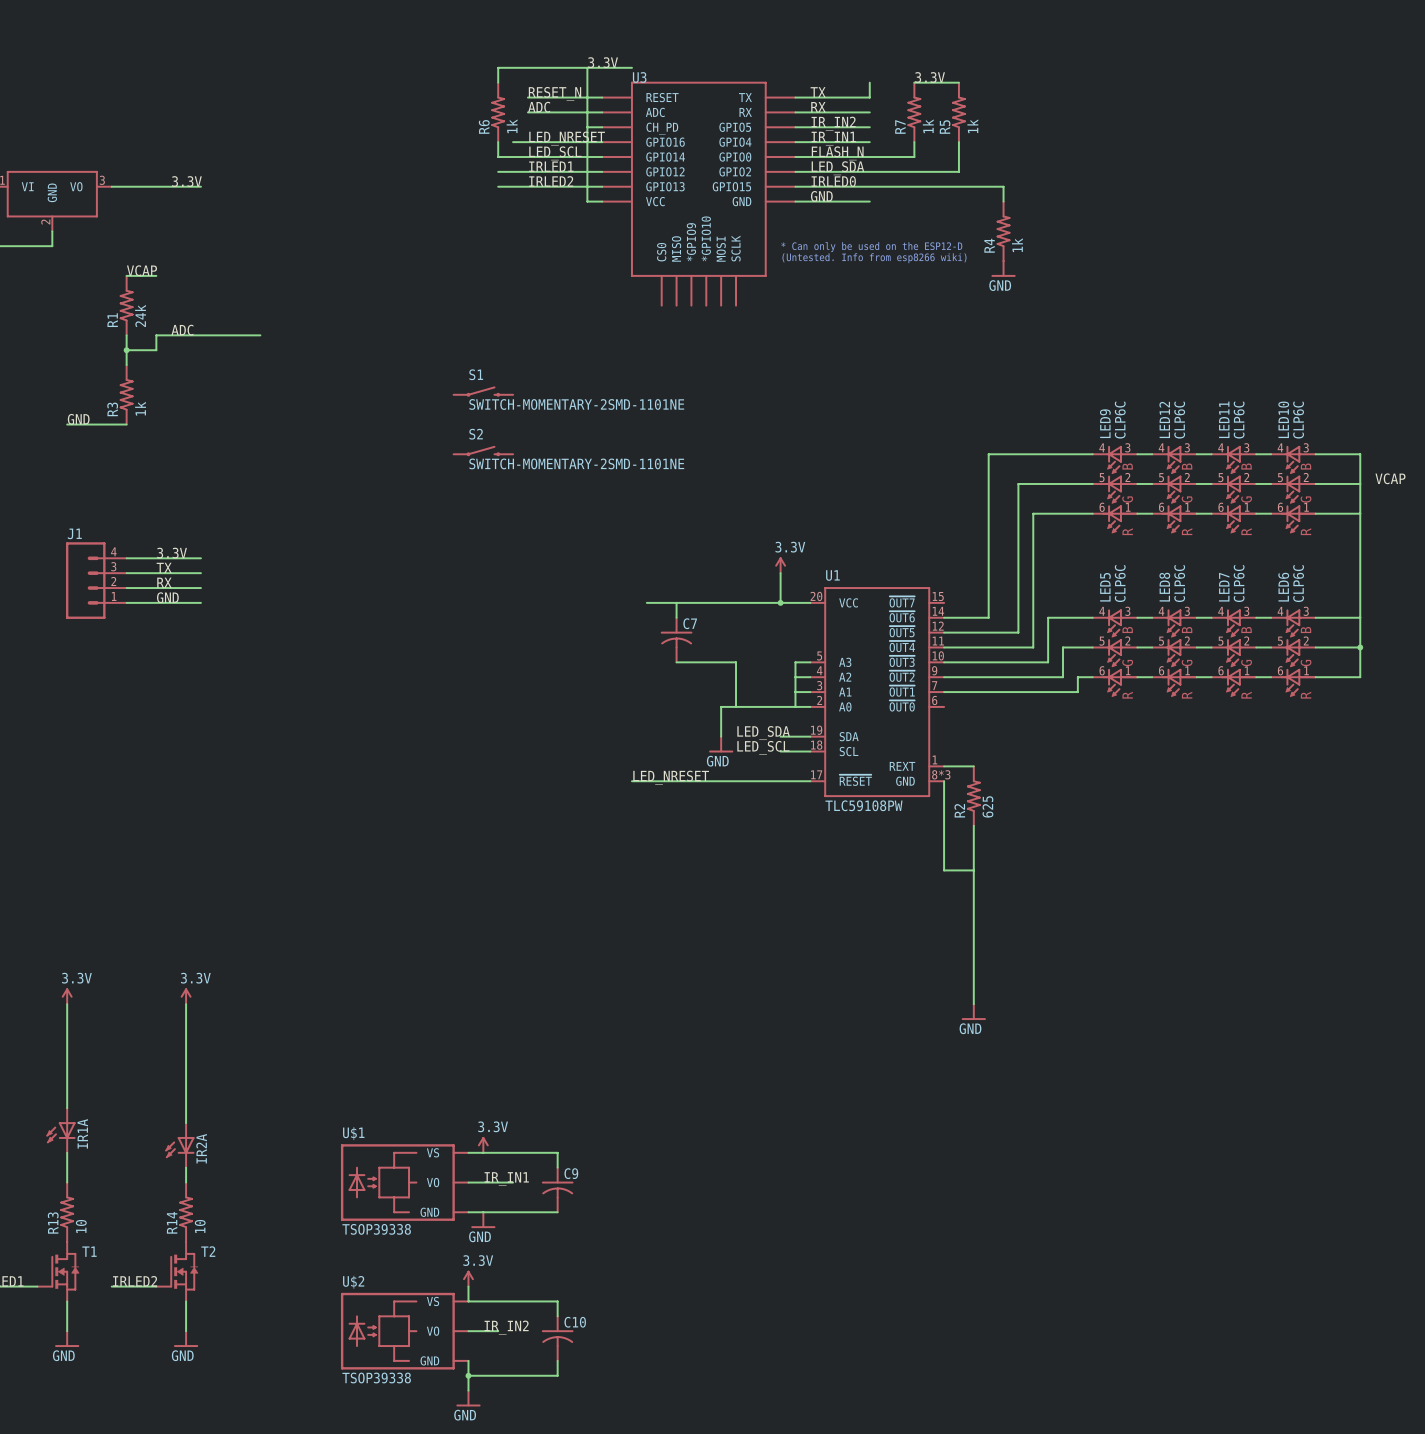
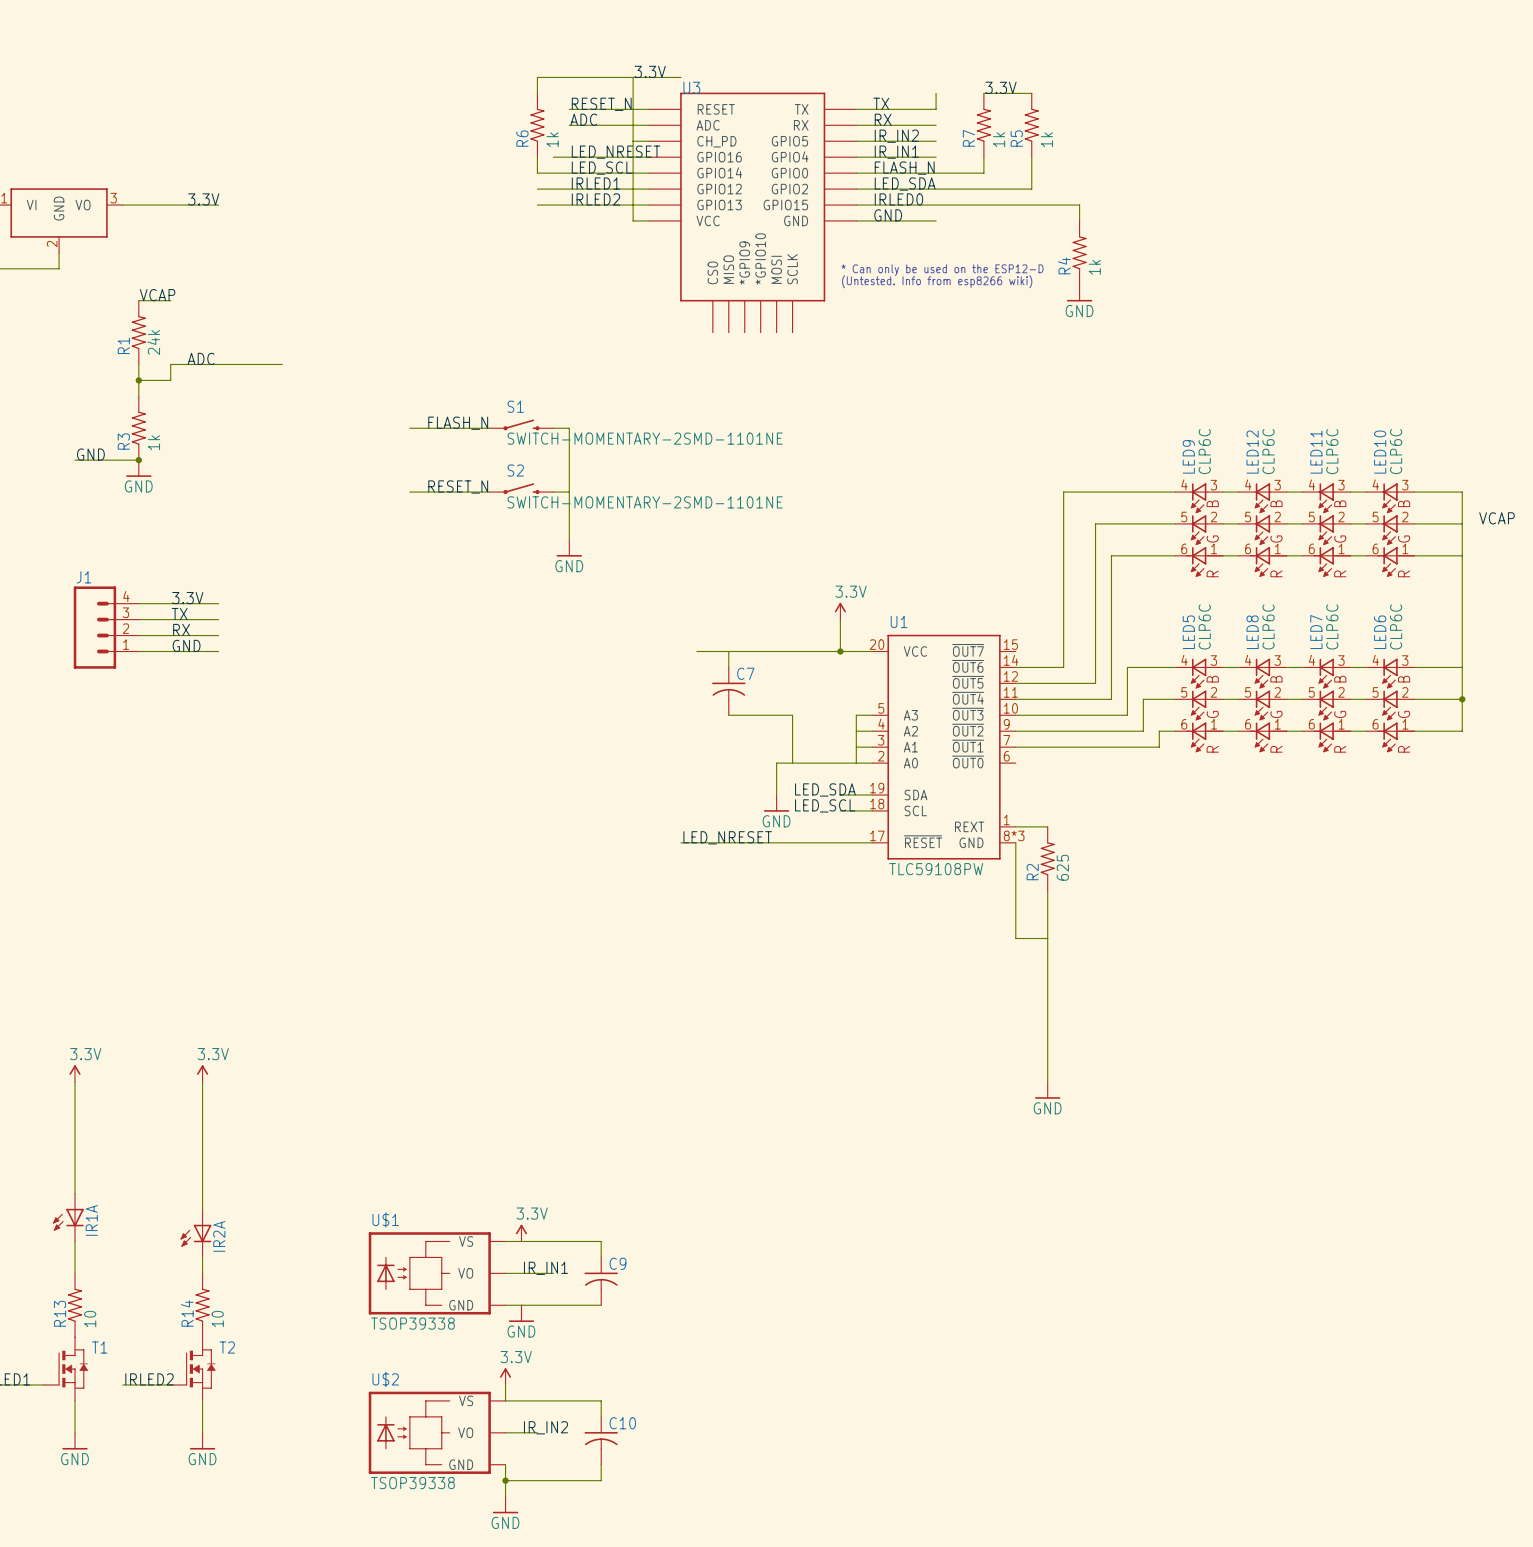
label: none -> FLASH_N (458, 423)
wire: none -> (409, 428) (489, 428)
wire: none -> (553, 428) (569, 428) (569, 539)
junction: none -> (138, 460)
power symbol: none -> GND (138, 468)
label: none -> RESET_N (458, 486)
wire: none -> (409, 492) (489, 492)
wire: none -> (553, 492) (569, 492)
power symbol: none -> GND (569, 548)

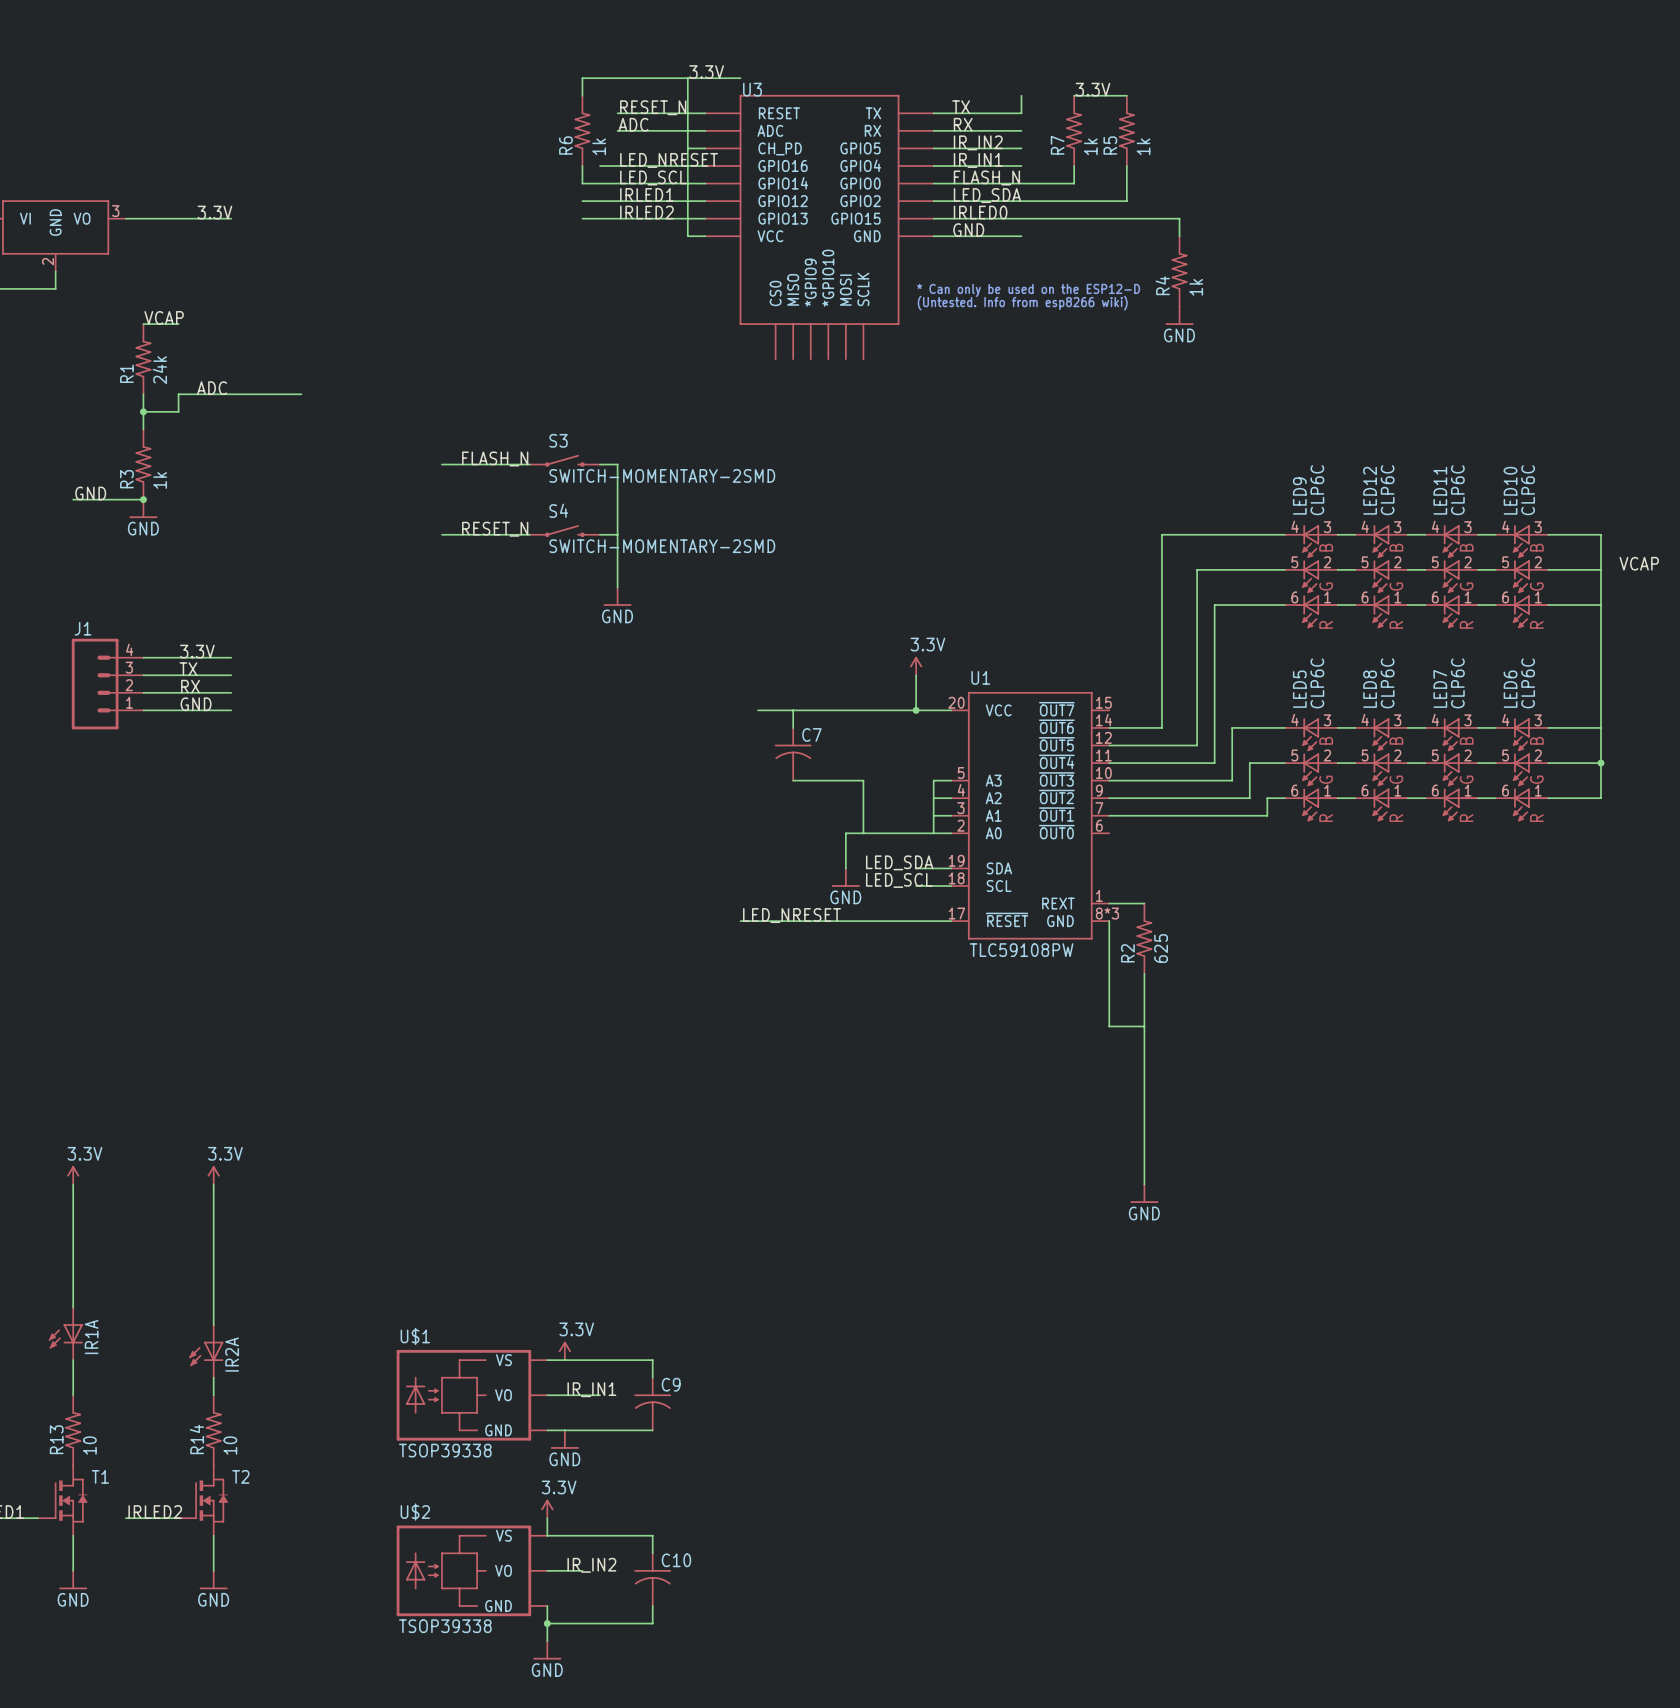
S1 name: S1 (515, 406) -> S3 (558, 440)
S1 value: SWITCH-MOMENTARY-2SMD-1101NE (645, 438) -> SWITCH-MOMENTARY-2SMD (662, 475)
S2 name: S2 (515, 470) -> S4 (558, 510)
S2 value: SWITCH-MOMENTARY-2SMD-1101NE (645, 502) -> SWITCH-MOMENTARY-2SMD (662, 546)

